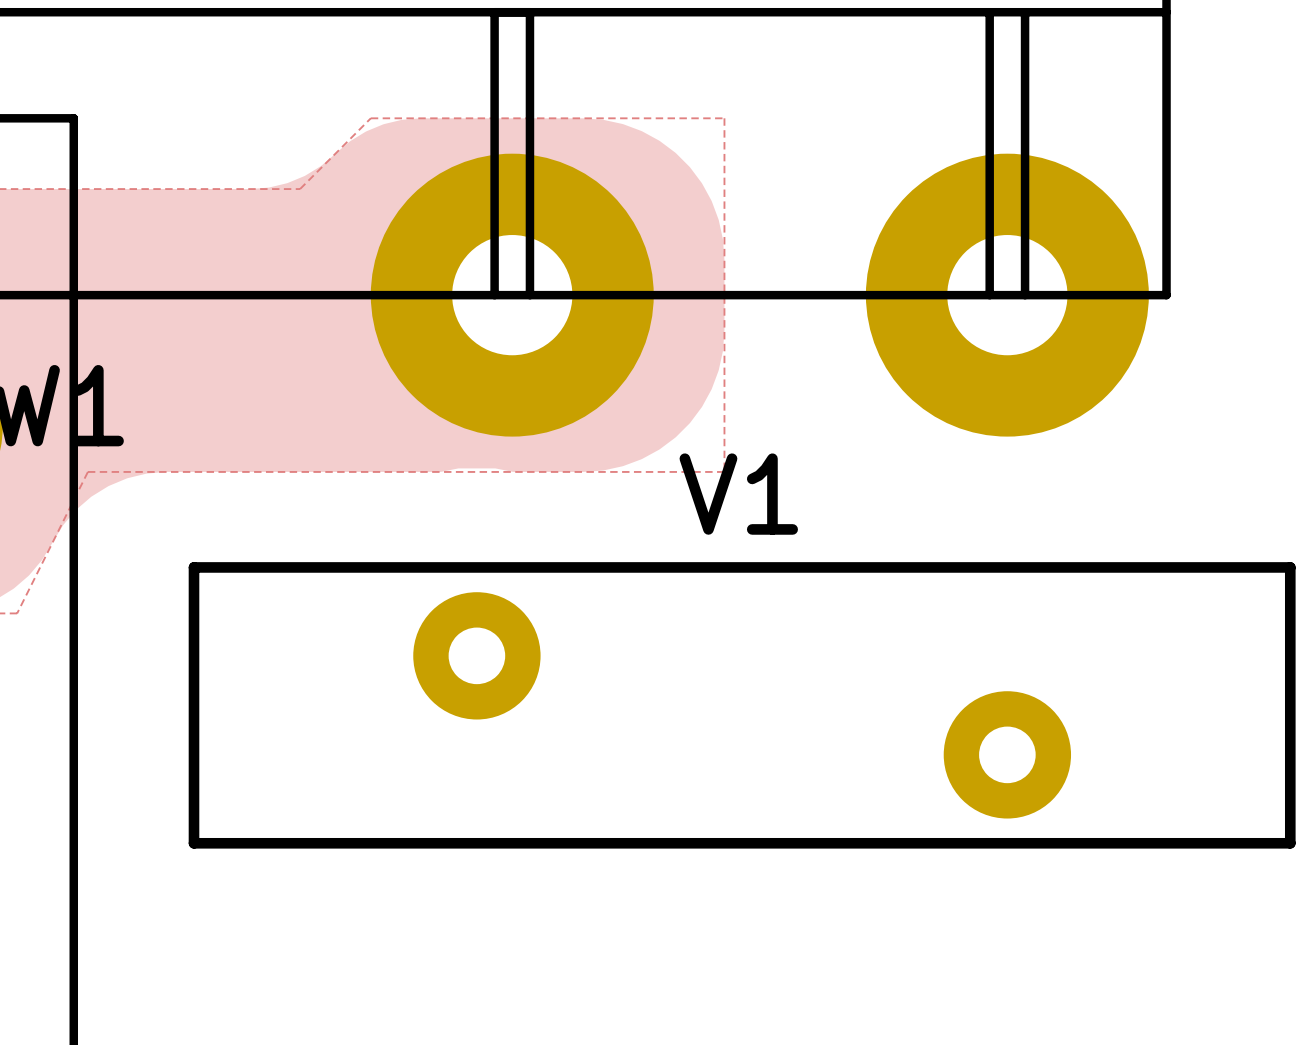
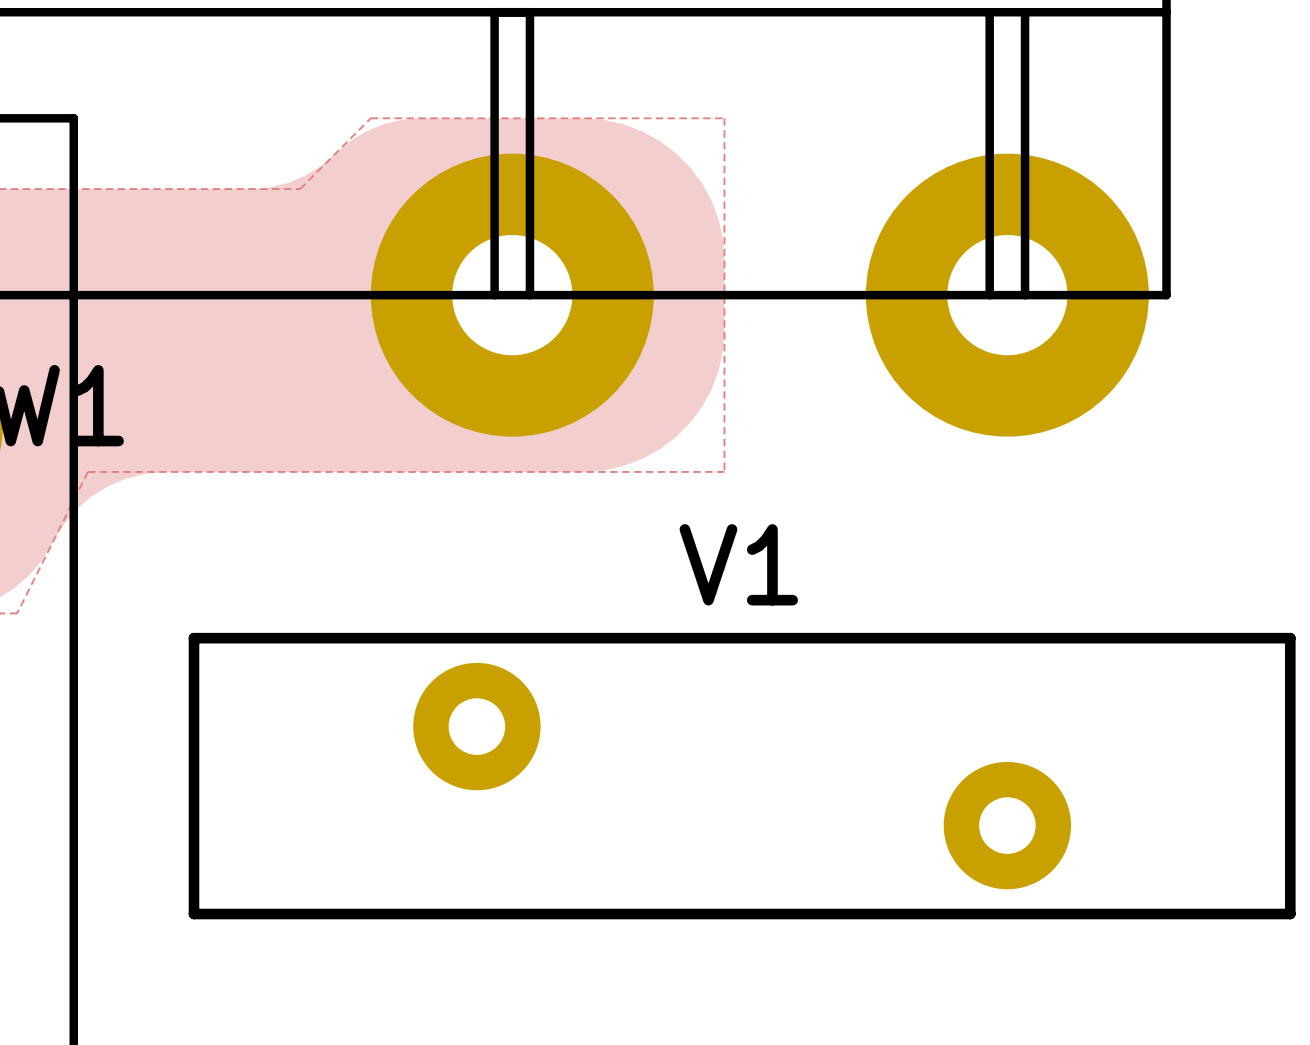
V1 position: (742, 705) -> (742, 776)

